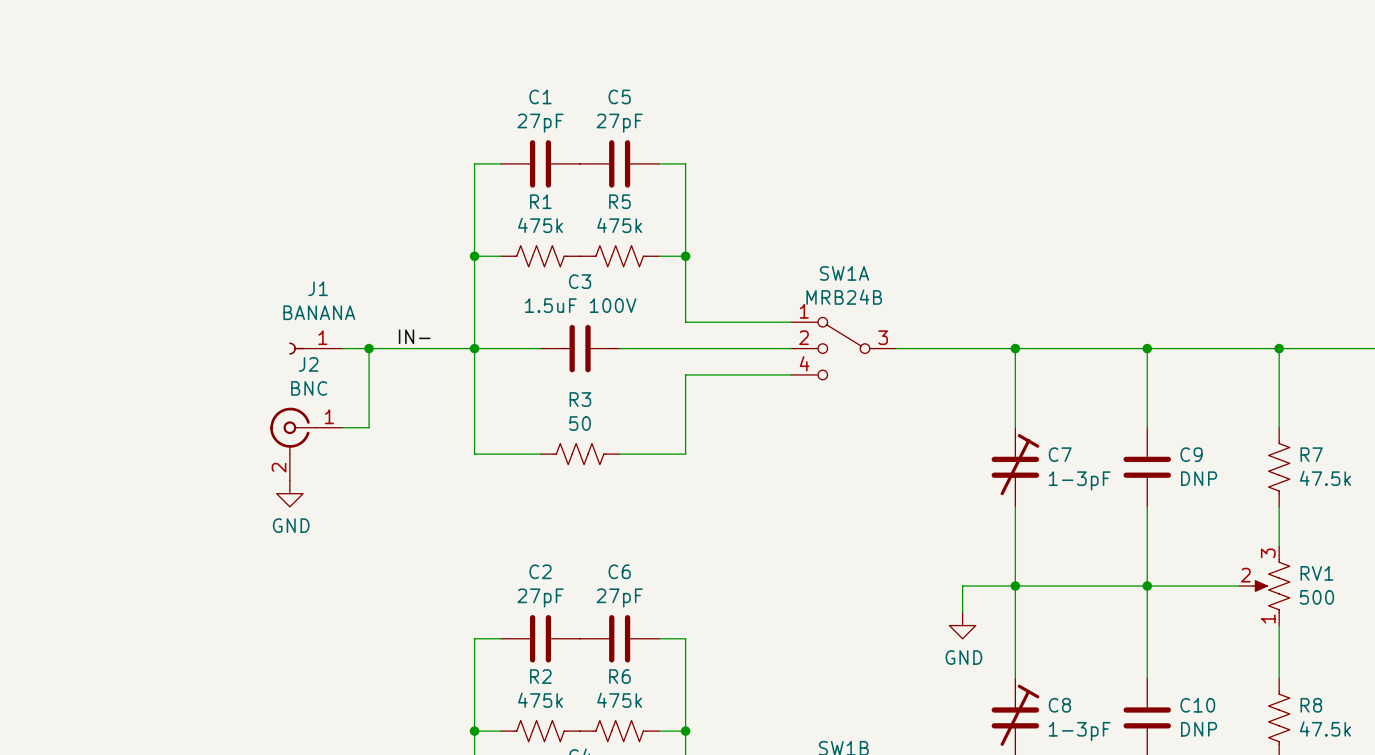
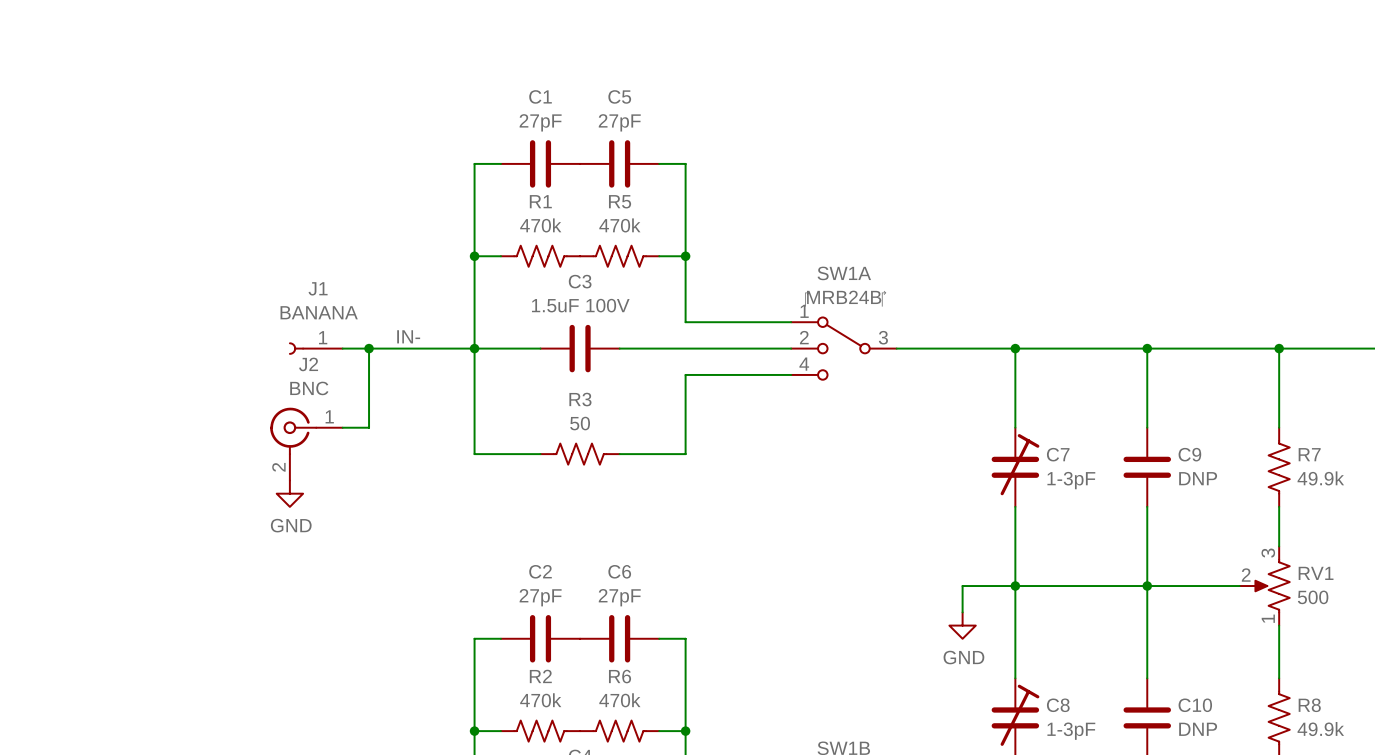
R1 value: 475k (540, 225) -> 470k (540, 225)
R5 value: 475k (619, 225) -> 470k (619, 225)
R7 value: 47.5k (1325, 478) -> 49.9k (1320, 478)
R2 value: 475k (540, 700) -> 470k (540, 700)
R6 value: 475k (619, 700) -> 470k (619, 700)
R8 value: 47.5k (1325, 728) -> 49.9k (1320, 729)

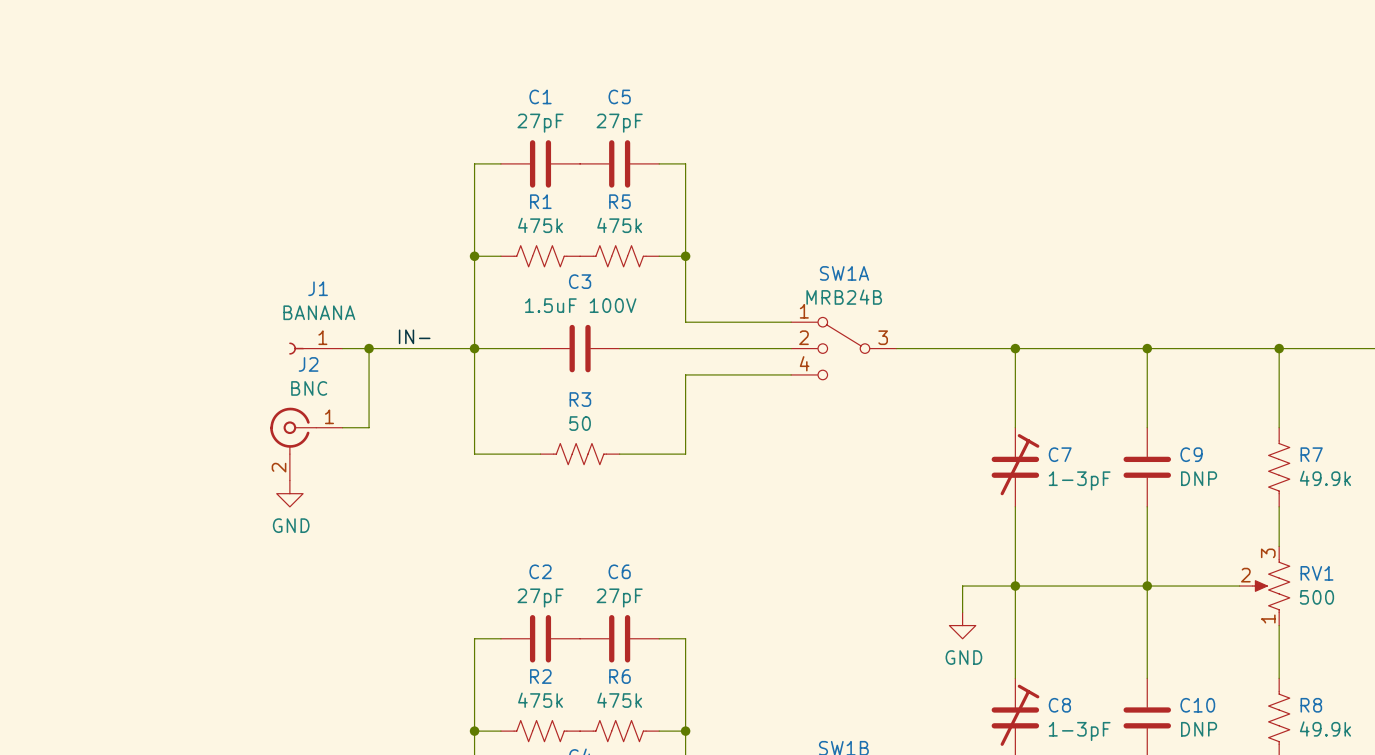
R1 value: 470k (540, 225) -> 475k (540, 225)
R5 value: 470k (619, 225) -> 475k (619, 225)
R2 value: 470k (540, 700) -> 475k (540, 700)
R6 value: 470k (619, 700) -> 475k (619, 700)

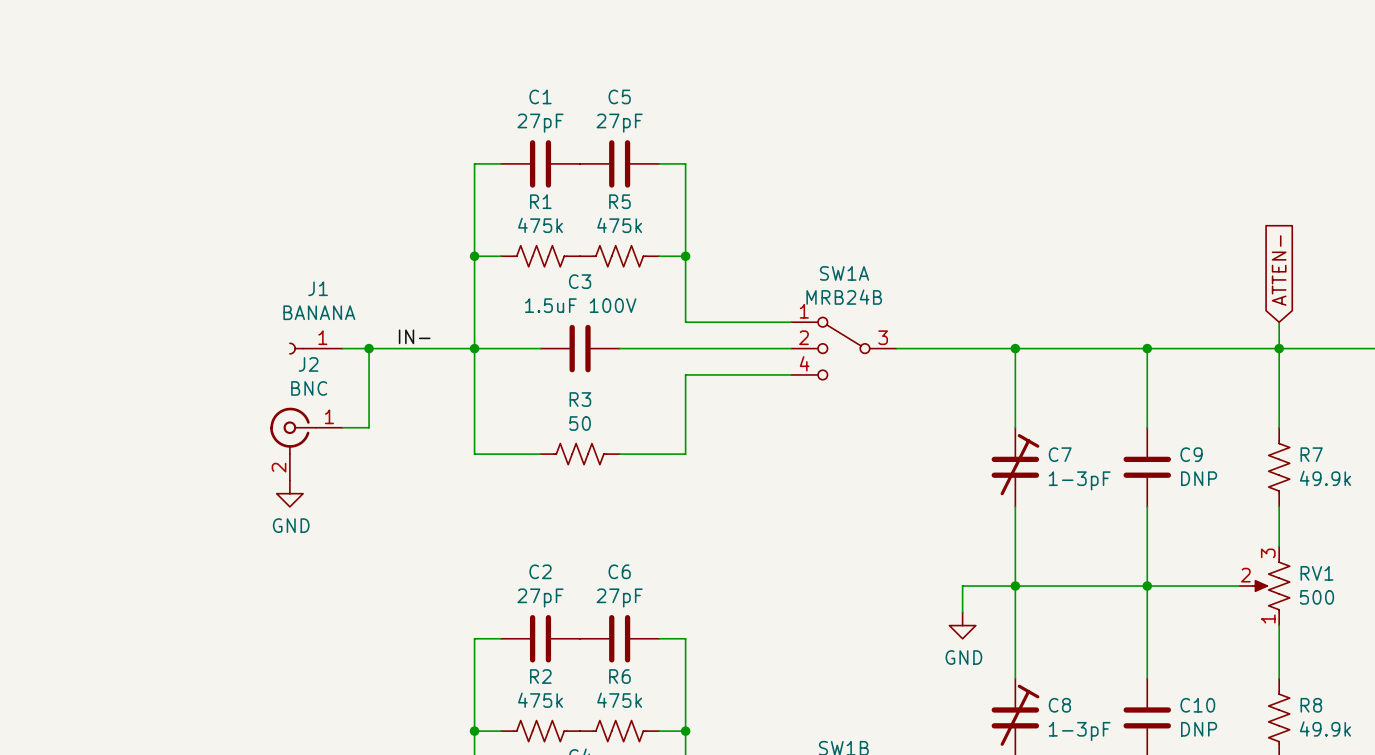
global label: none -> ATTEN- (1279, 270)
wire: none -> (1279, 322) (1279, 348)

